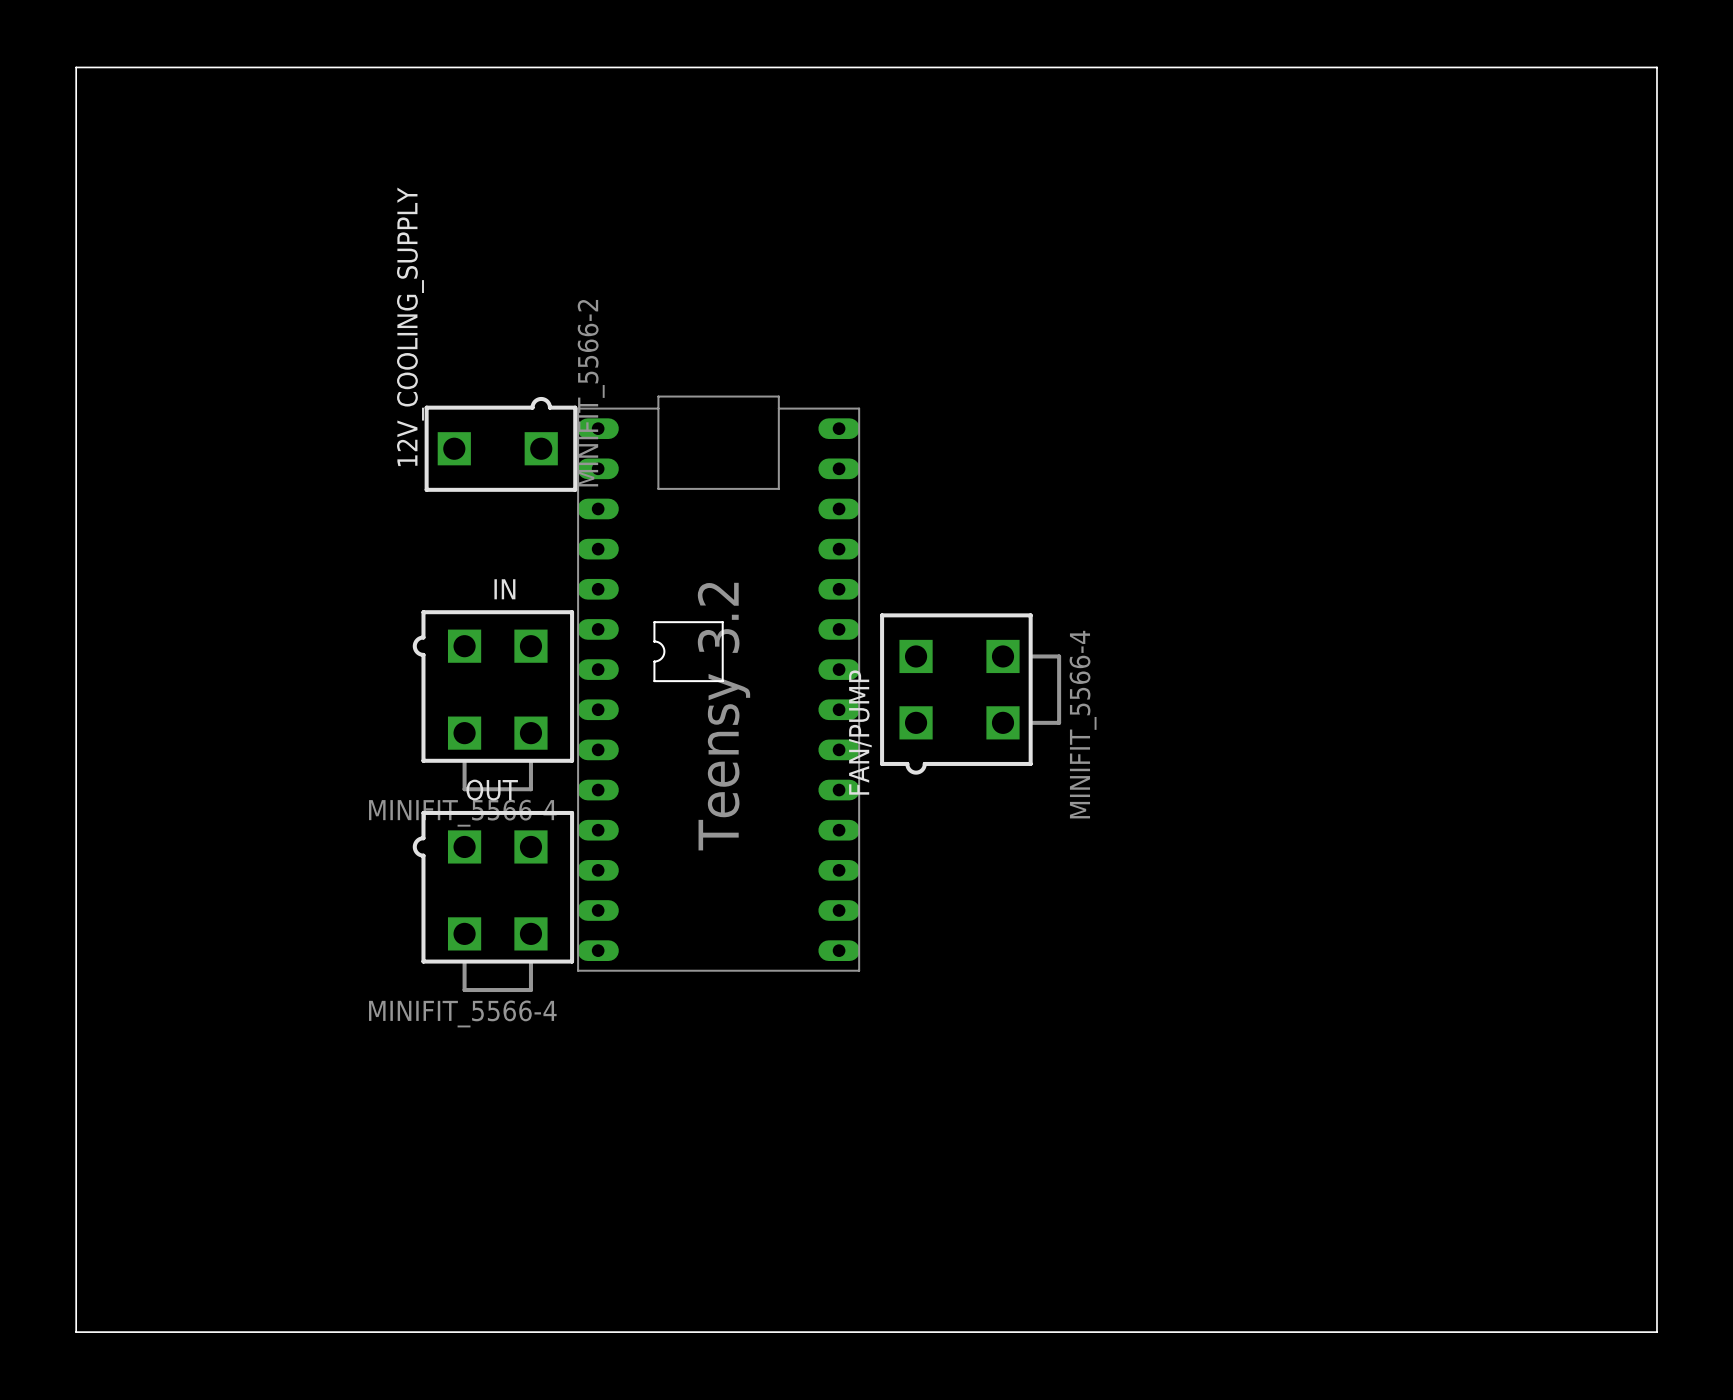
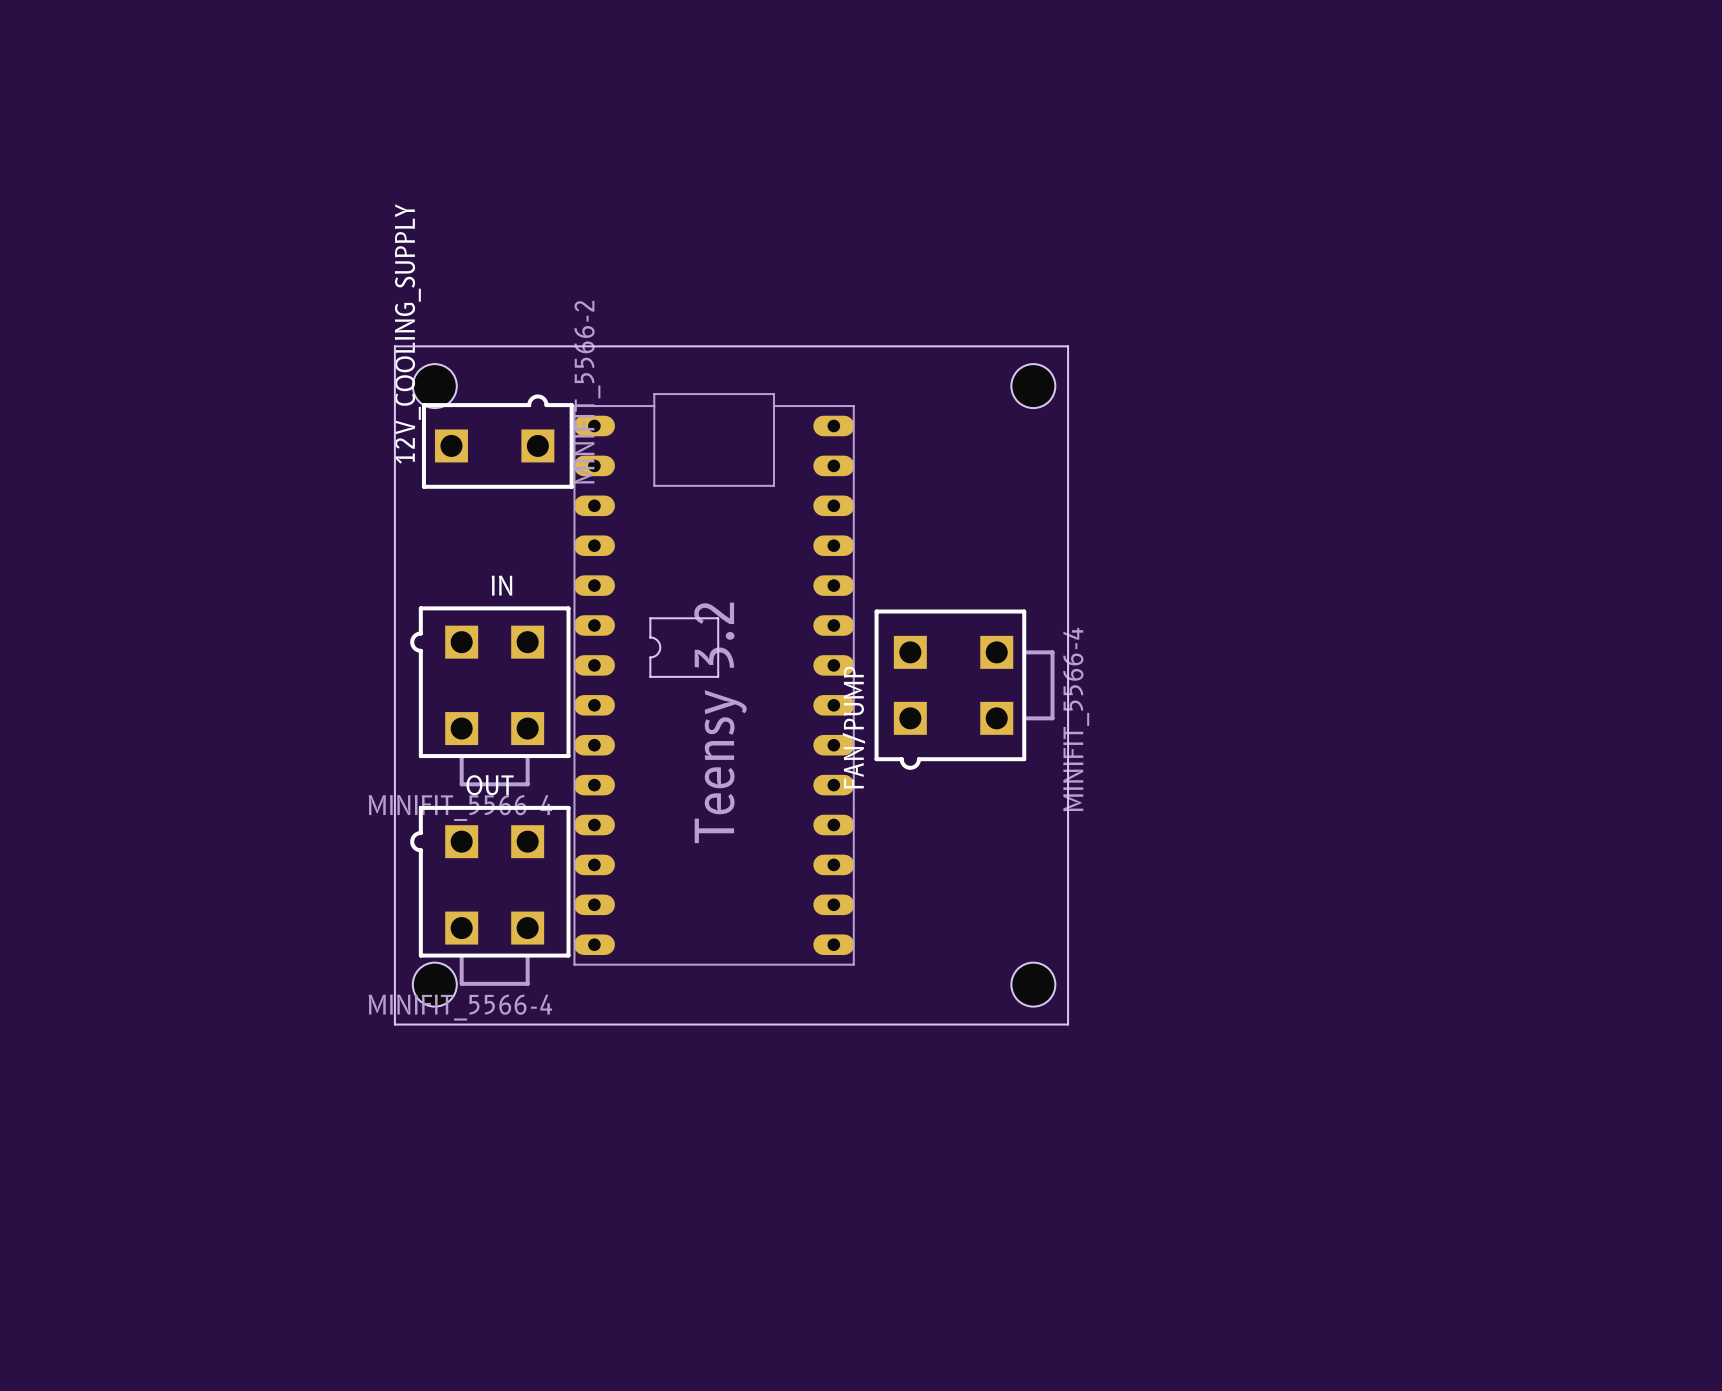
board edge: (76, 67) (1656, 67) (1656, 1332) (76, 1332) (76, 67) -> none
board edge: none -> (394, 346) (1068, 346) (1068, 1024) (394, 1024) (394, 346)
hole: none -> (434, 386)
hole: none -> (1033, 386)
hole: none -> (434, 984)
hole: none -> (1033, 984)

